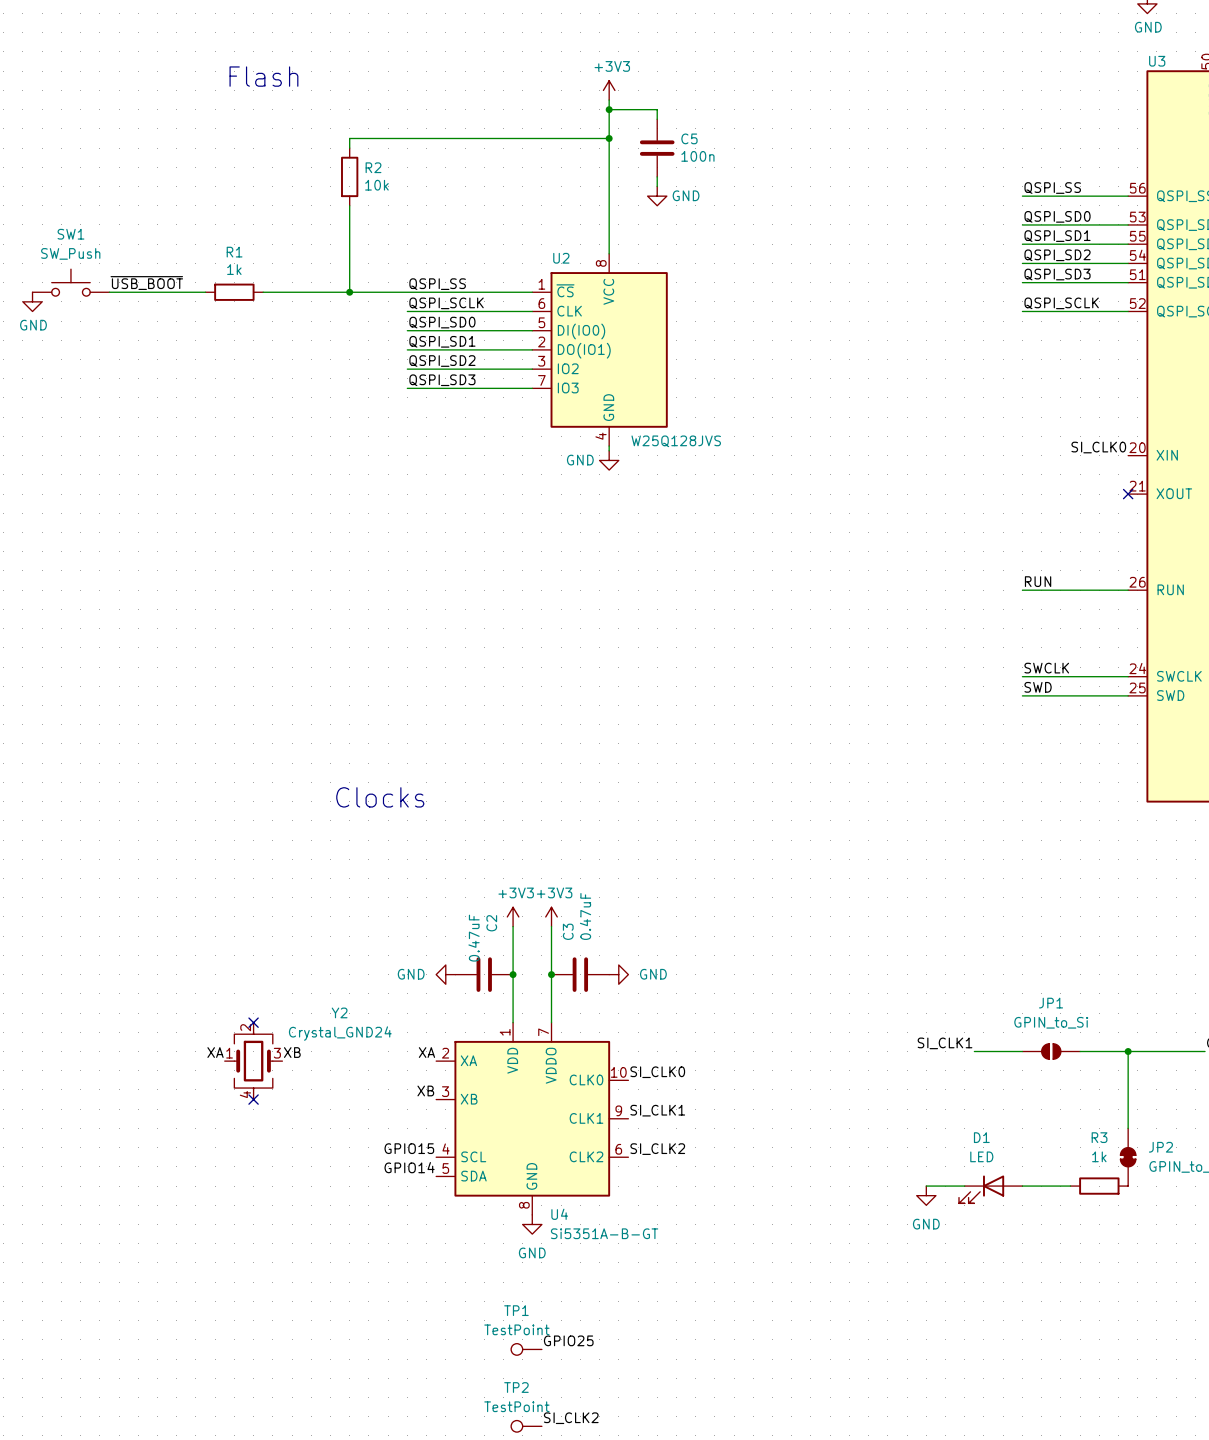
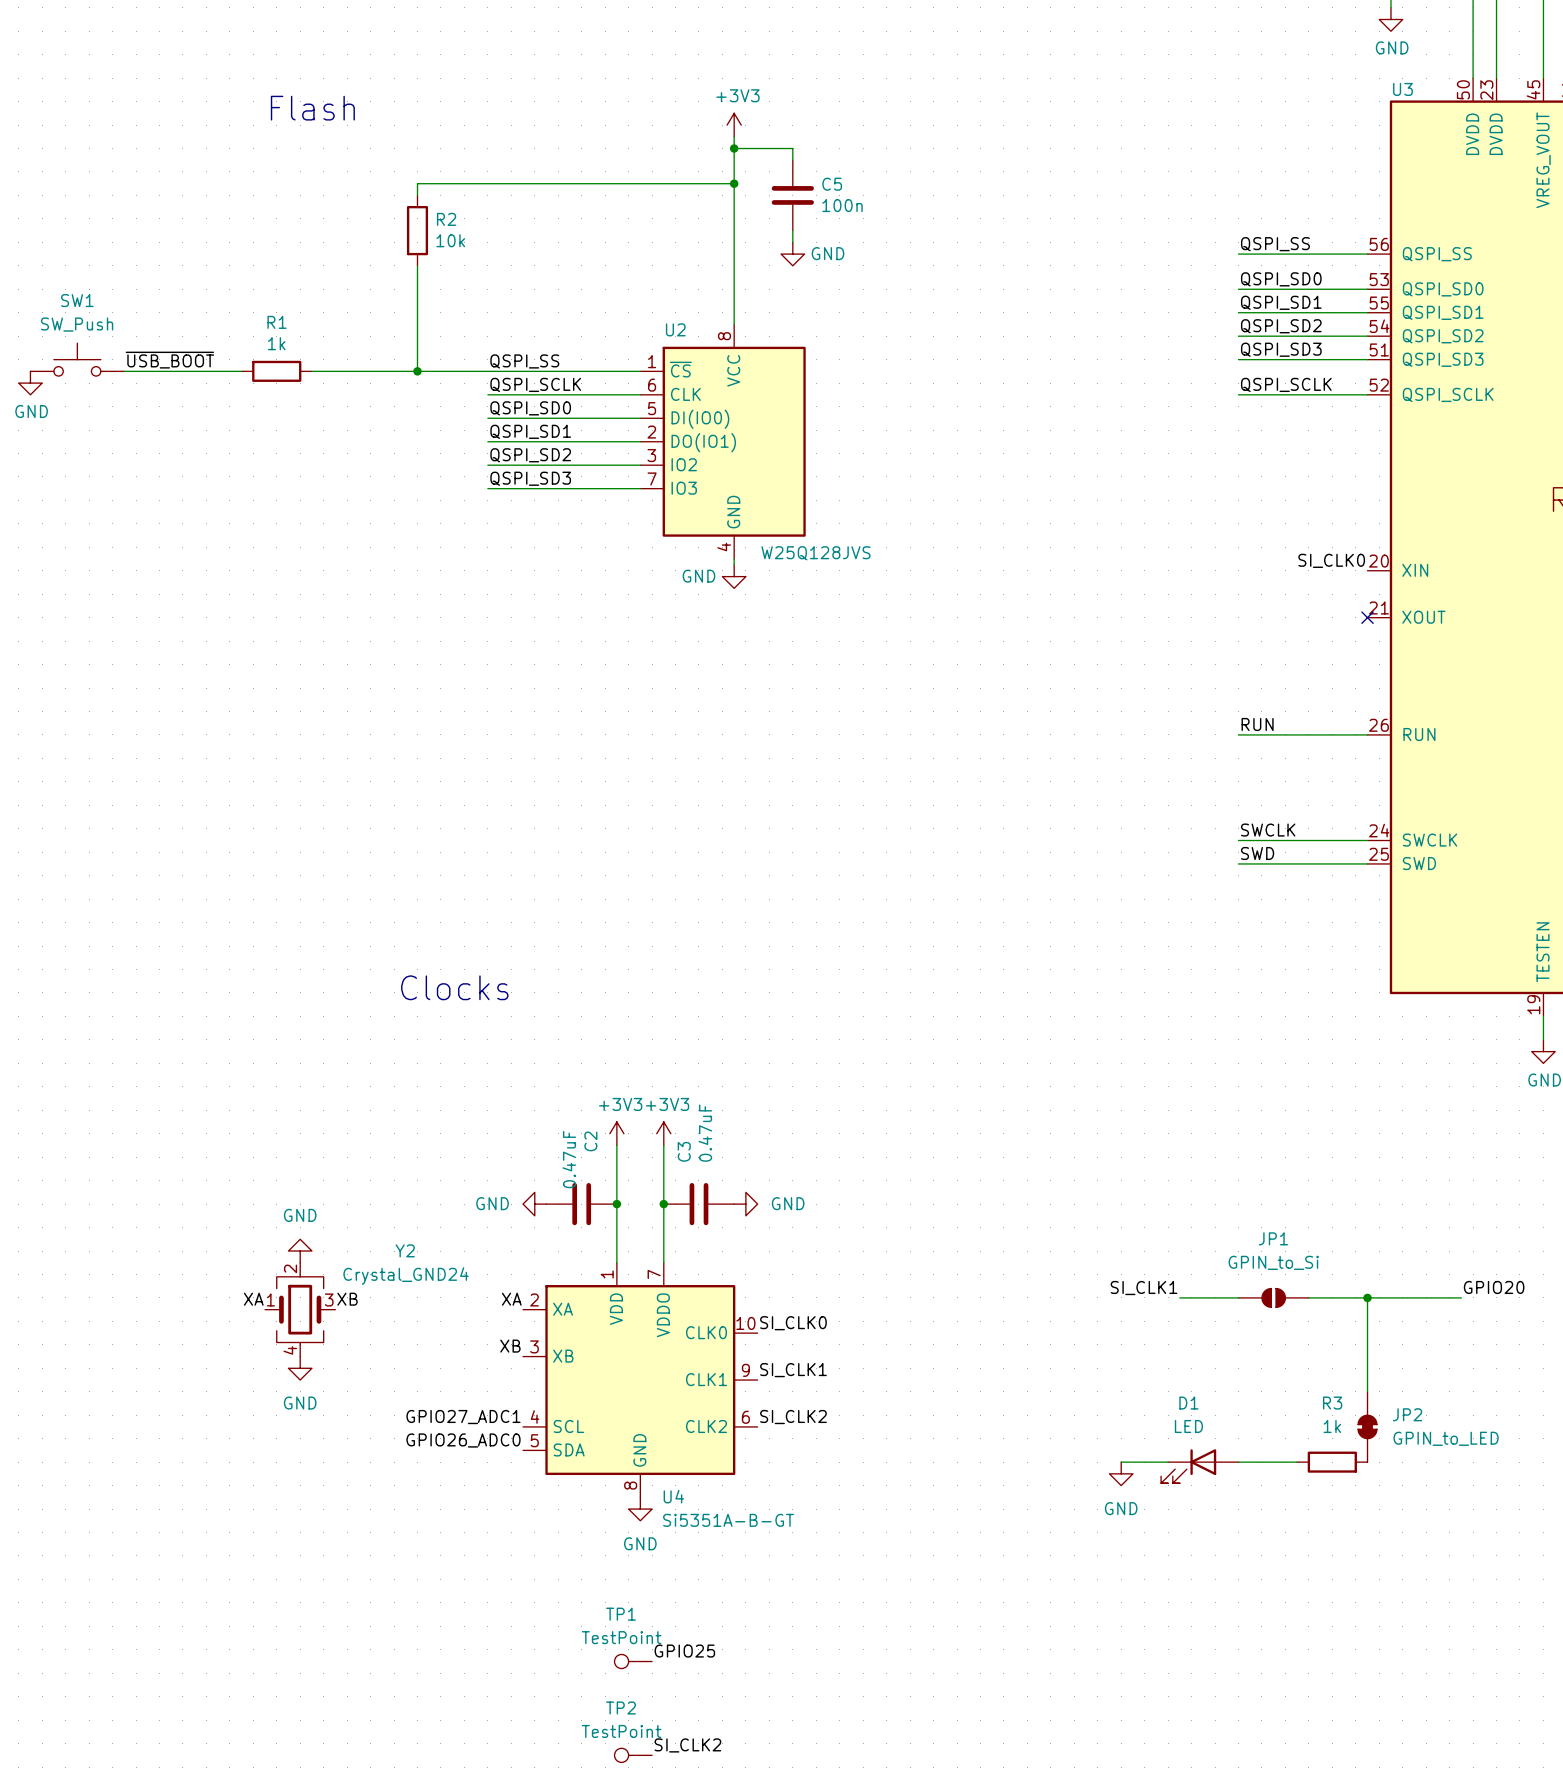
power symbol: none -> GND (300, 1251)
no-connect mark: (253, 1022) -> none
no-connect mark: (253, 1099) -> none
power symbol: none -> GND (300, 1368)
label: GPIO15 (409, 1148) -> GPIO27_ADC1 (463, 1417)
label: GPIO14 (409, 1167) -> GPIO26_ADC0 (463, 1440)

